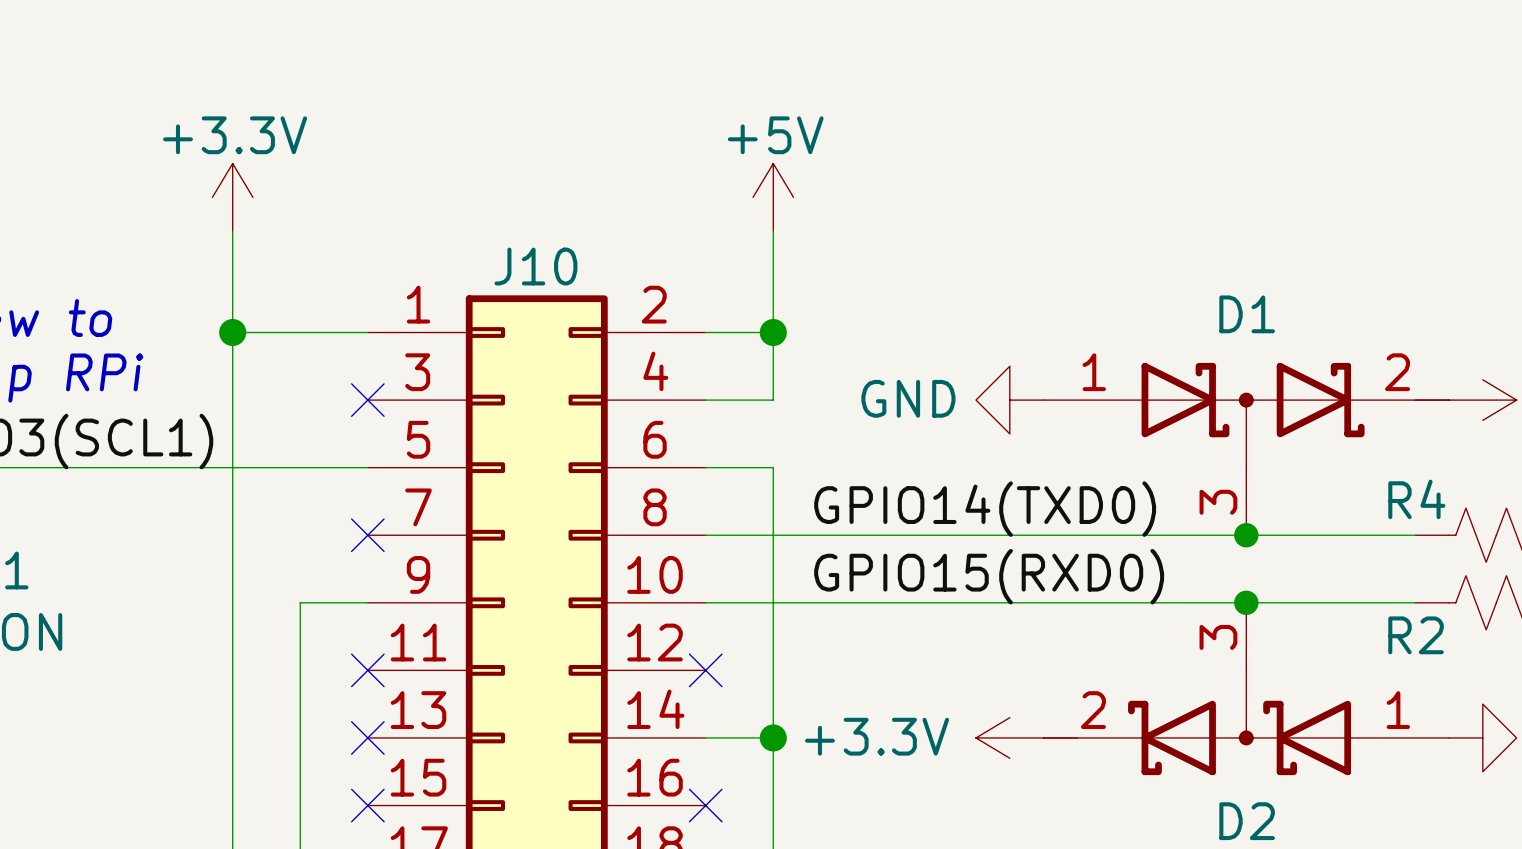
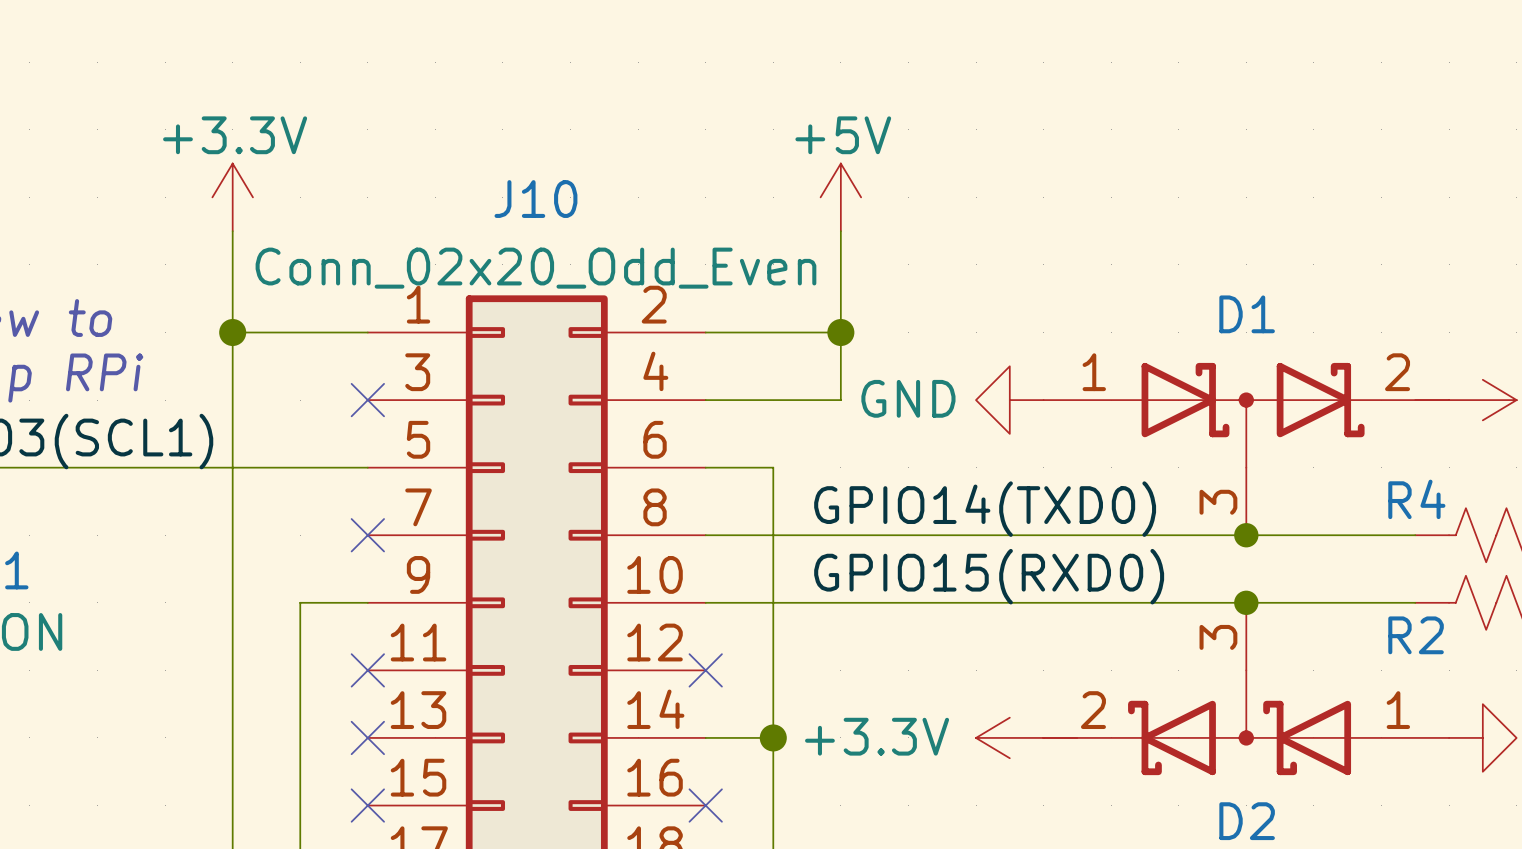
power symbol position: +5V (773, 197) -> +5V (840, 197)
wire: (773, 231) (773, 400) -> (840, 231) (840, 400) (773, 400)
J10 name position: J10 (535, 266) -> J10 (535, 199)
J10 value: none -> Conn_02x20_Odd_Even (535, 268)
wire: none -> (773, 332) (840, 332)
junction position: (773, 332) -> (840, 332)

